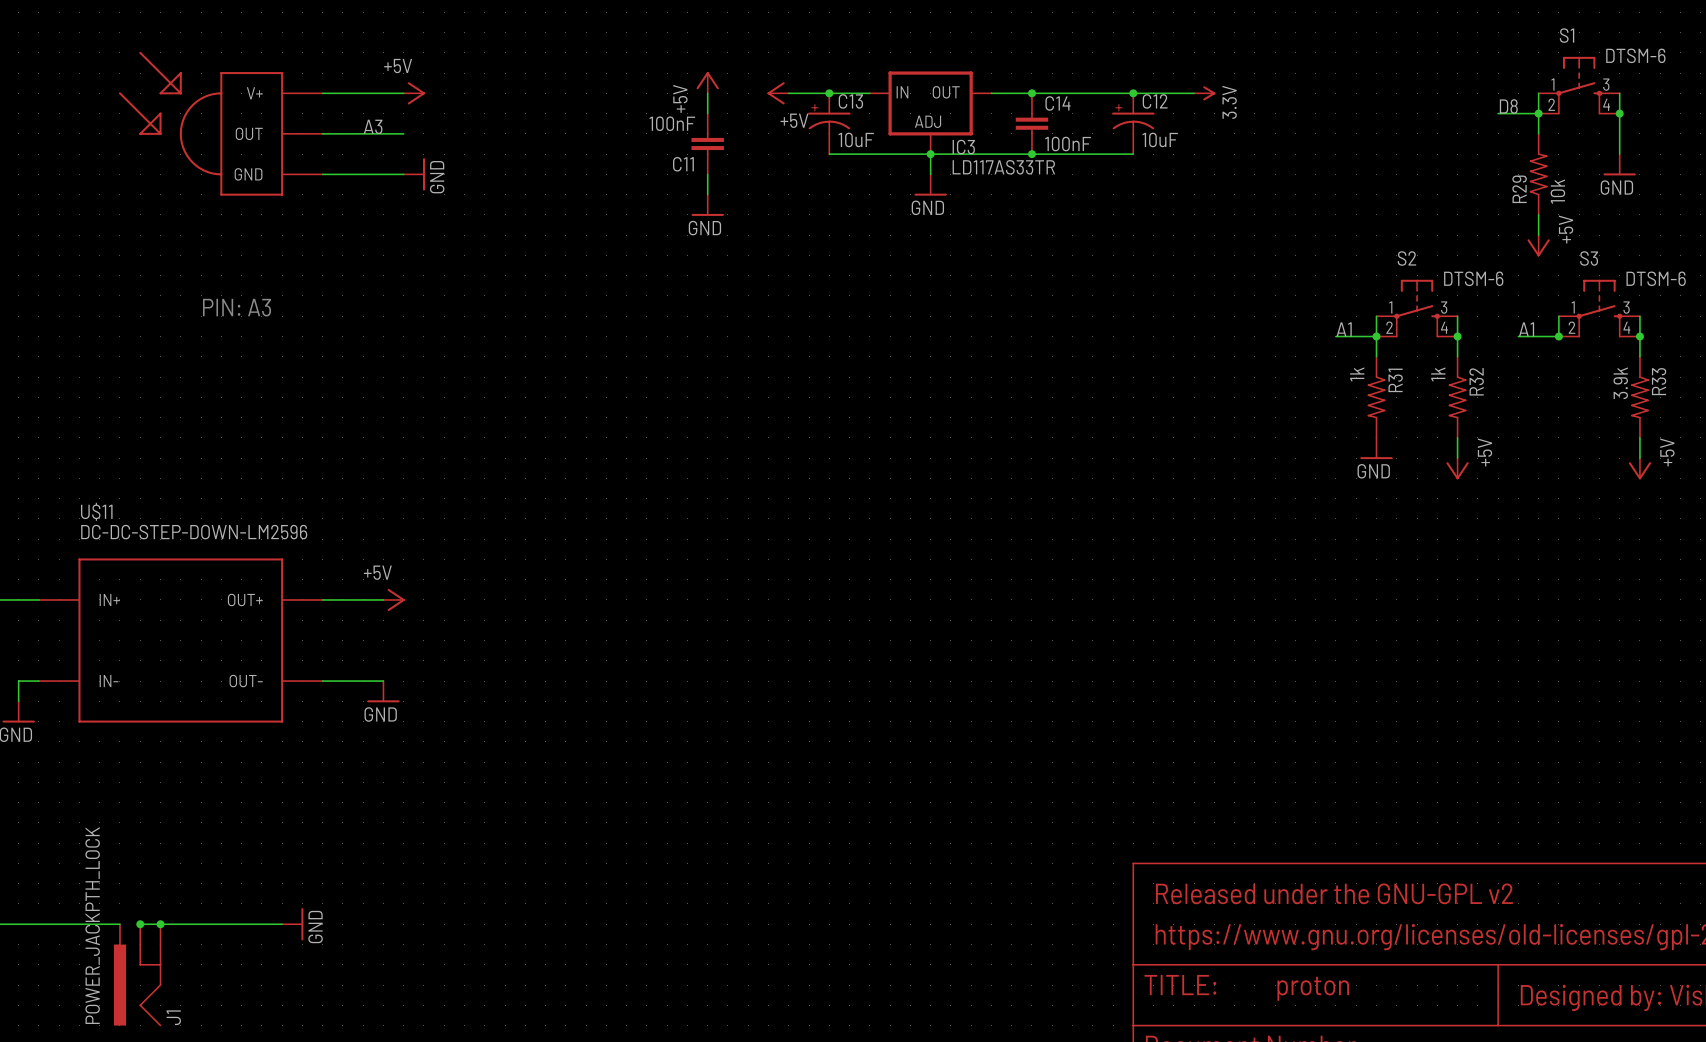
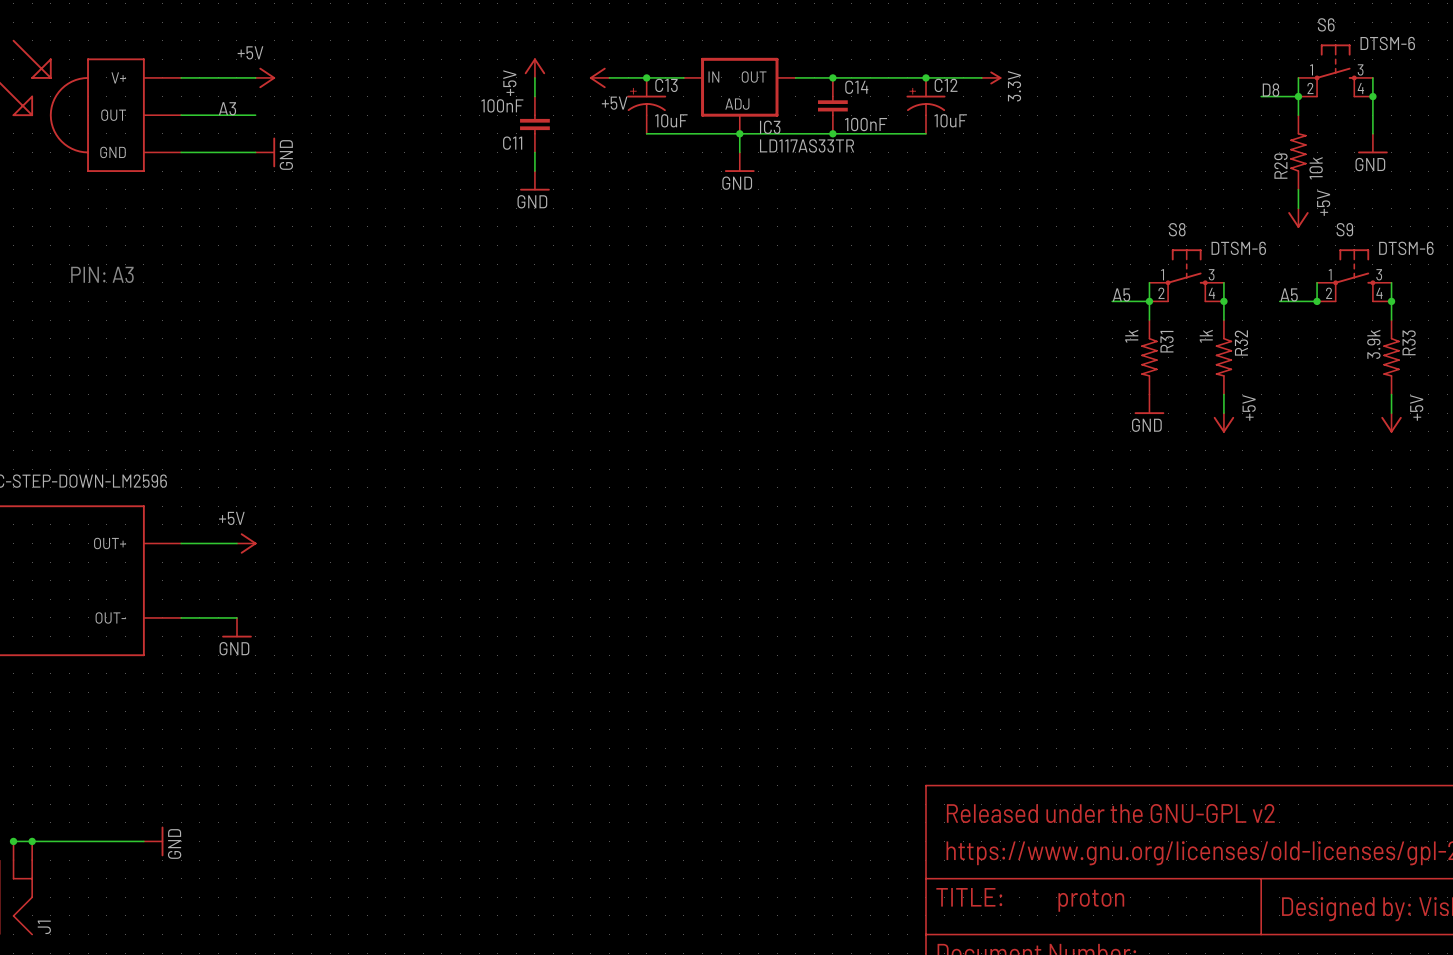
S1 name: S1 (1567, 35) -> S6 (1326, 24)
S2 name: S2 (1406, 258) -> S8 (1177, 229)
S3 name: S3 (1589, 258) -> S9 (1344, 229)
label: A1 (1344, 329) -> A5 (1121, 294)
label: A1 (1526, 329) -> A5 (1289, 294)

